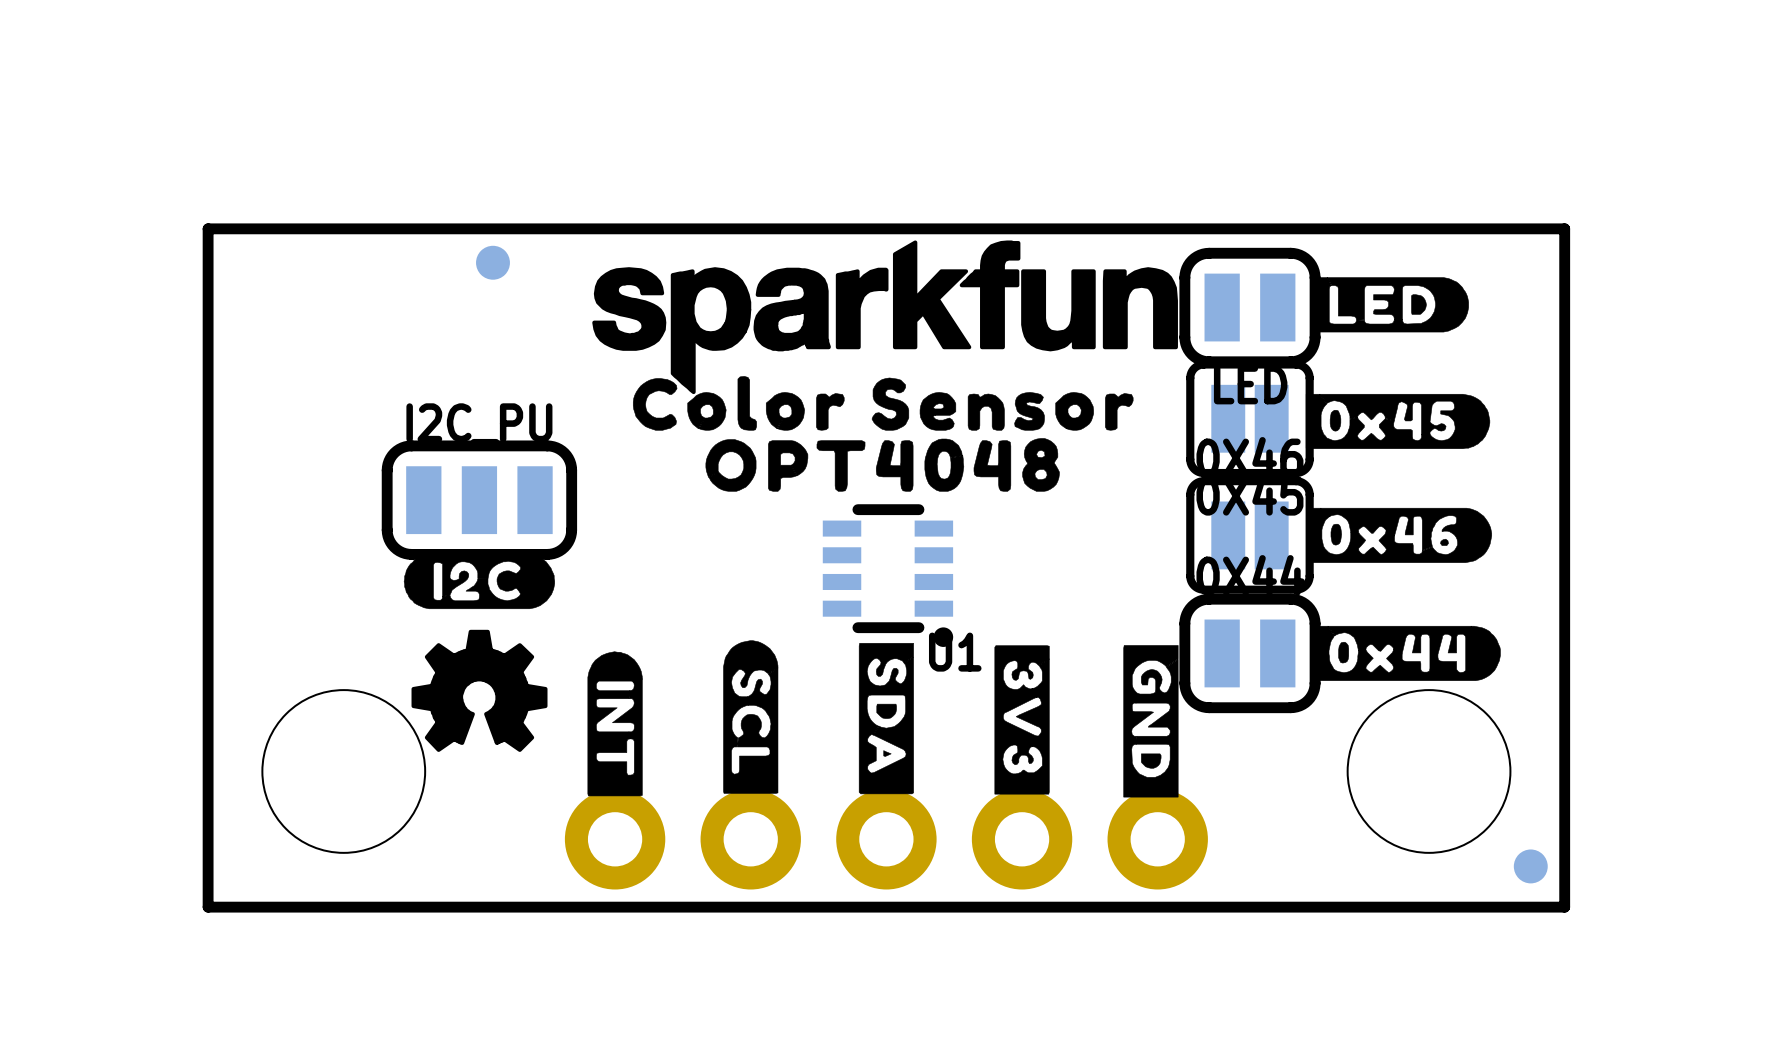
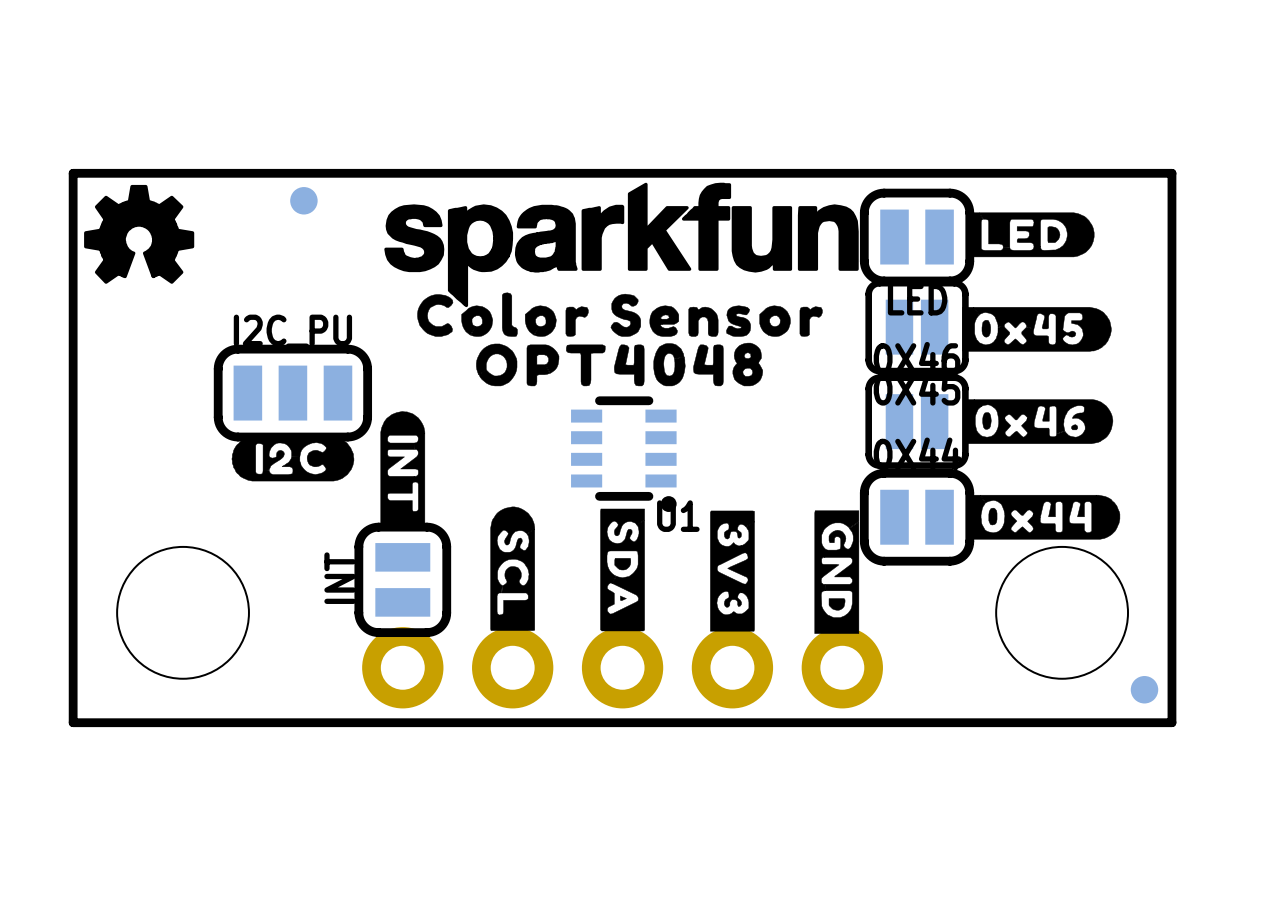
drawing position: (479, 690) -> (139, 234)
drawing position: (615, 723) -> (402, 469)
INT: none -> (402, 579)

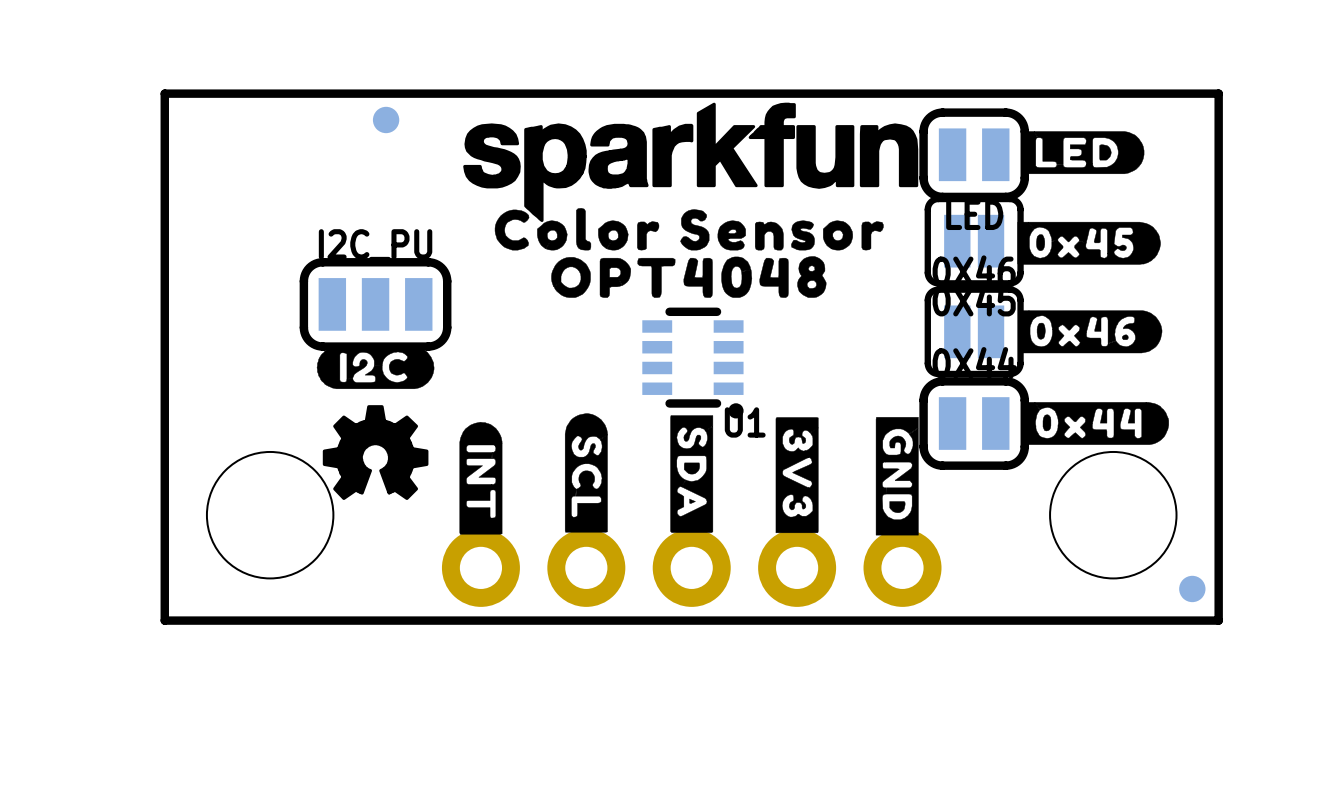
drawing position: (139, 234) -> (375, 452)
drawing position: (402, 469) -> (480, 478)
INT: (402, 579) -> none

